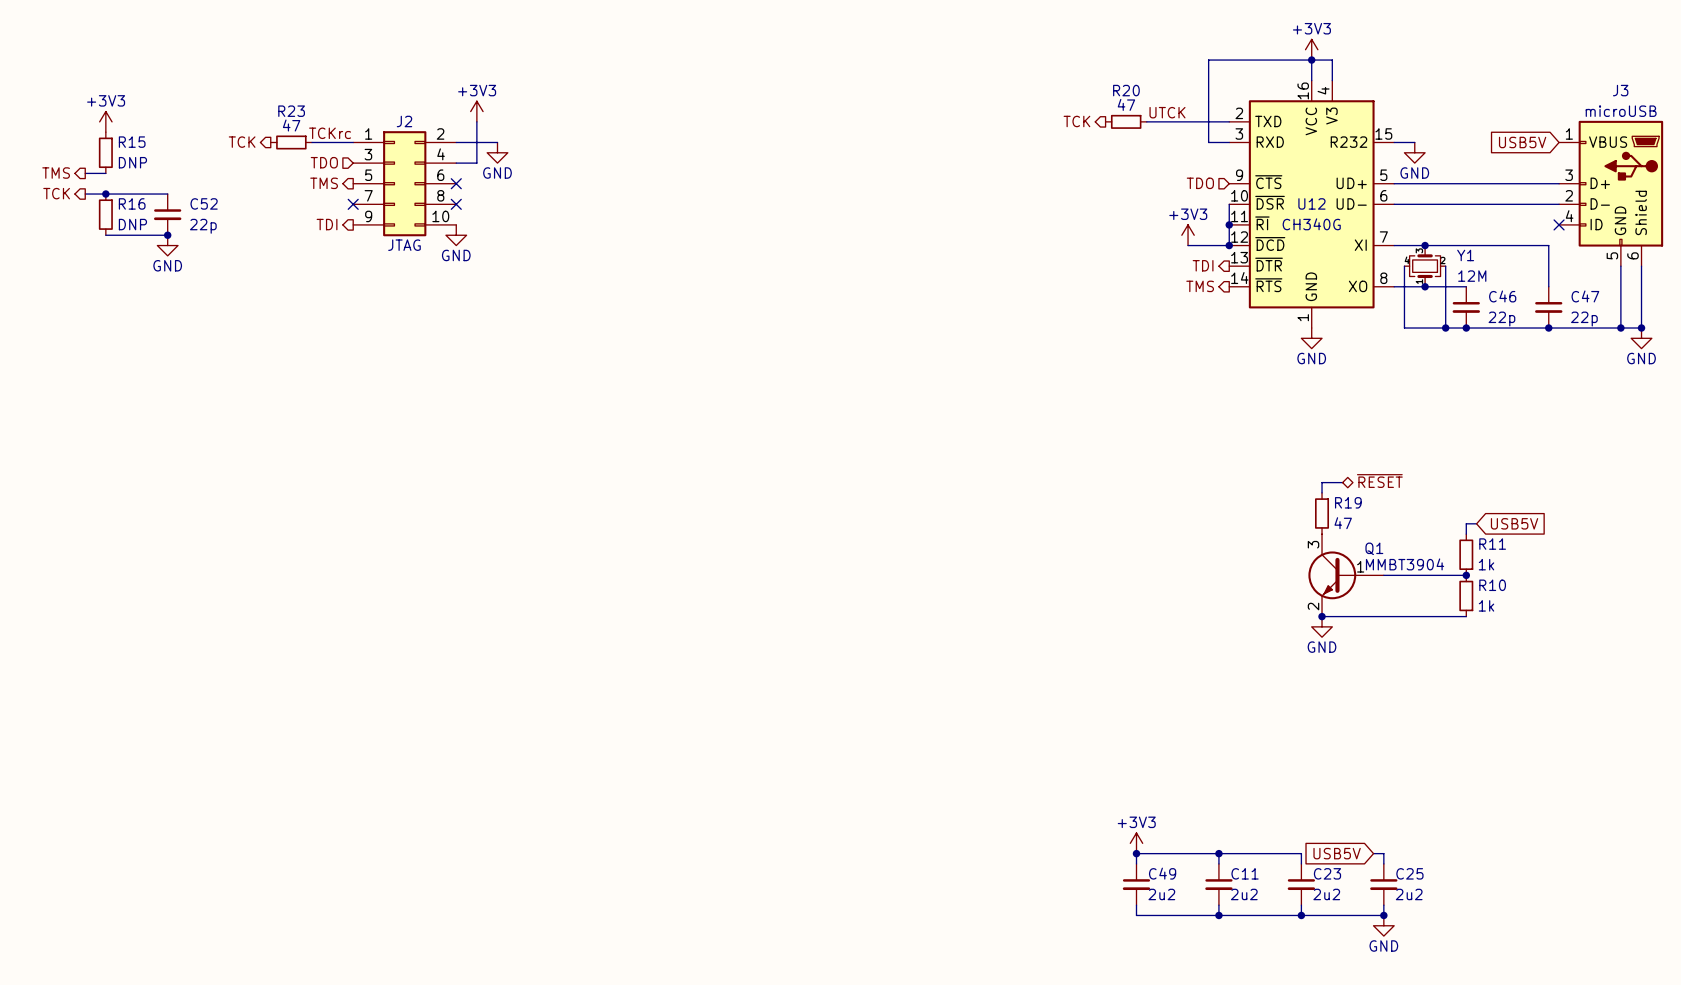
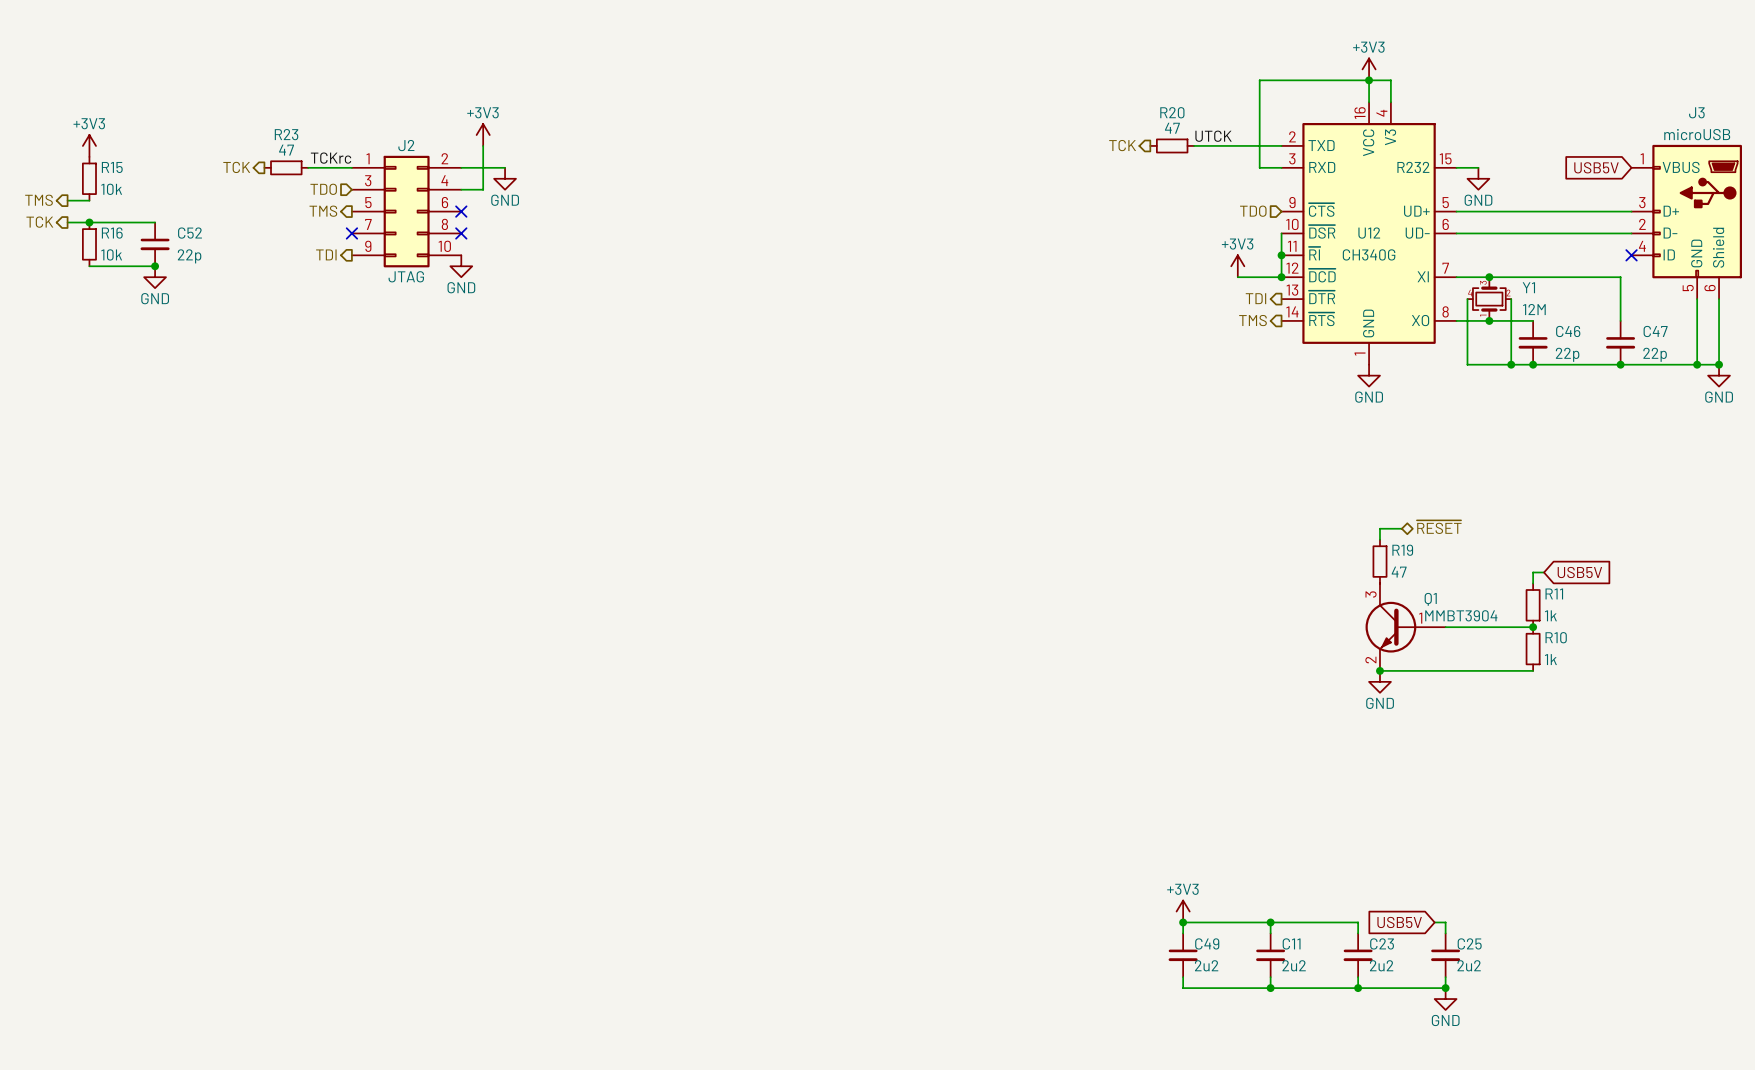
R15 value: DNP (132, 162) -> 10k (111, 189)
R16 value: DNP (132, 224) -> 10k (111, 254)

